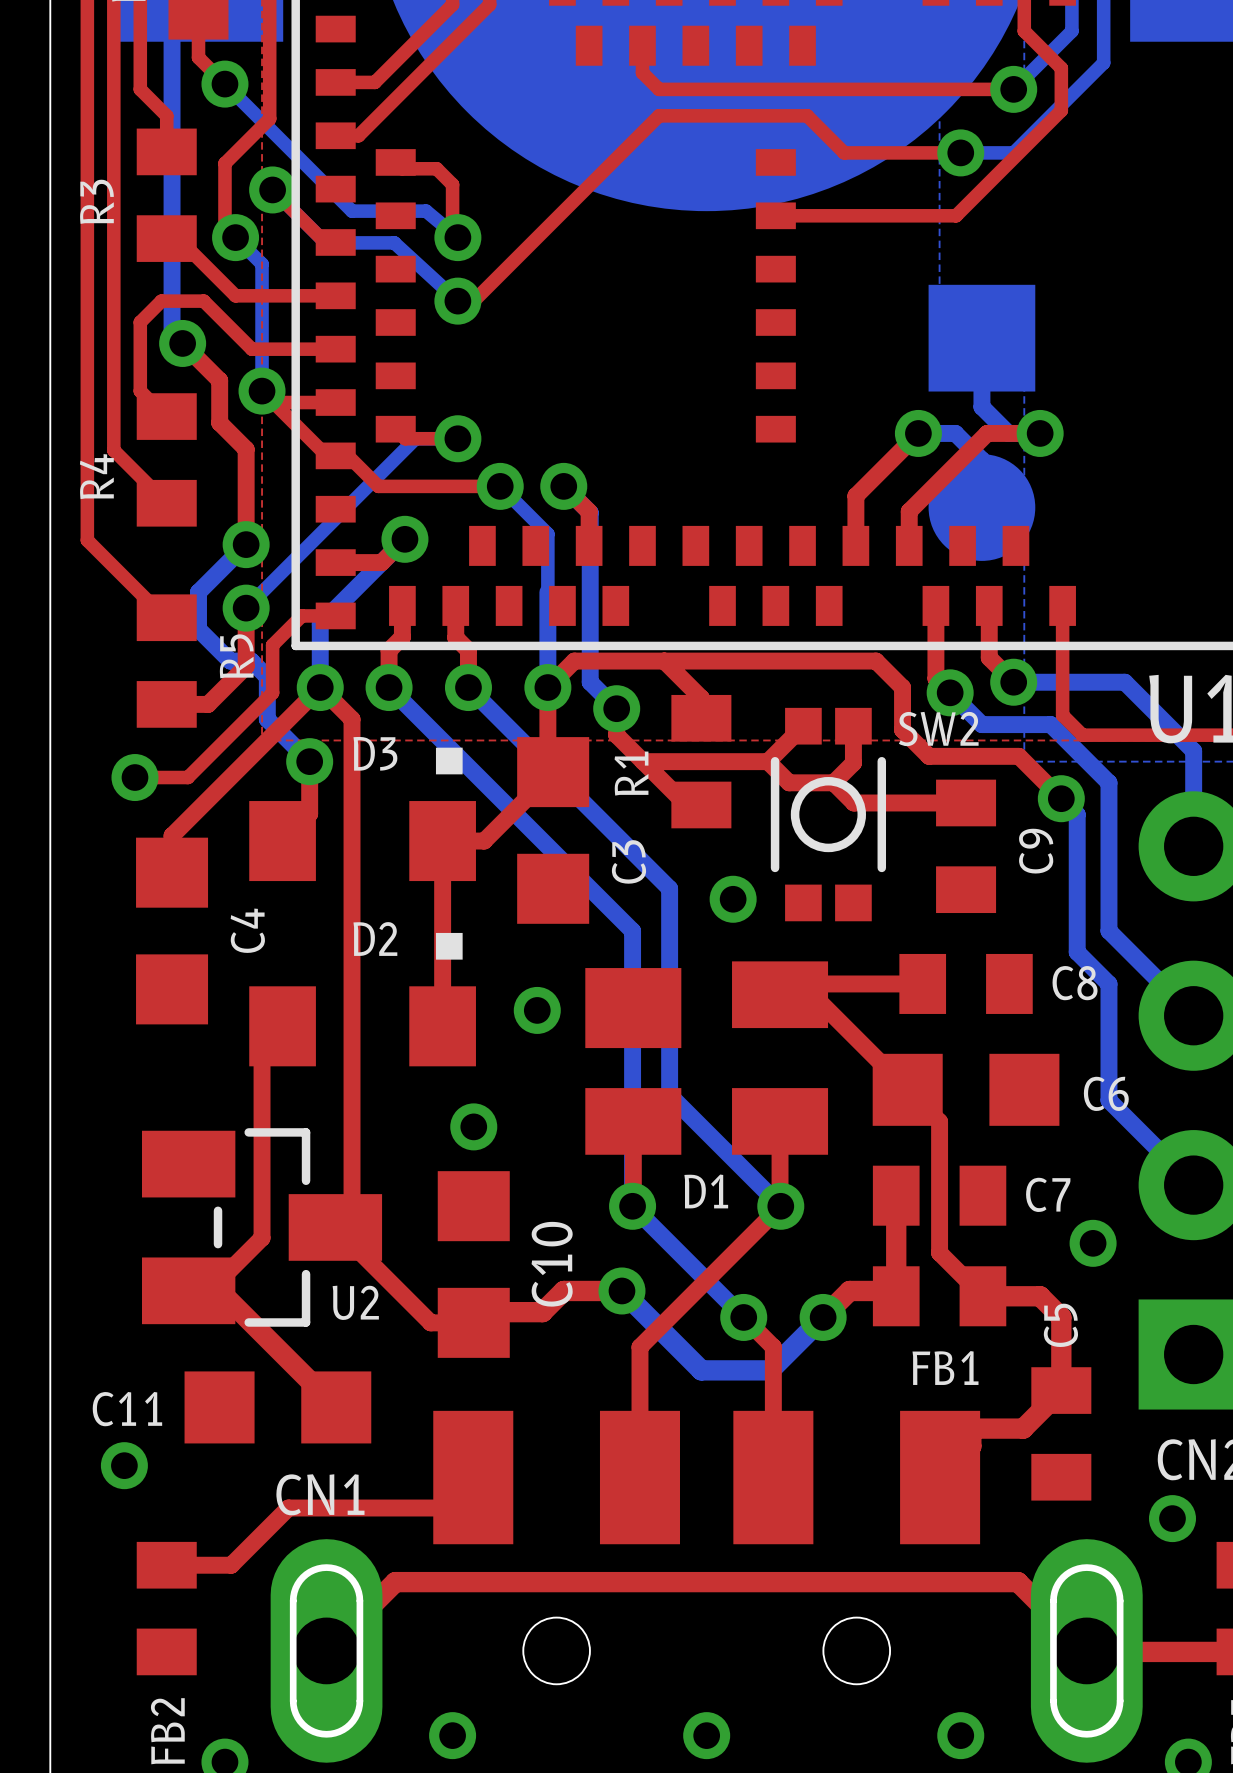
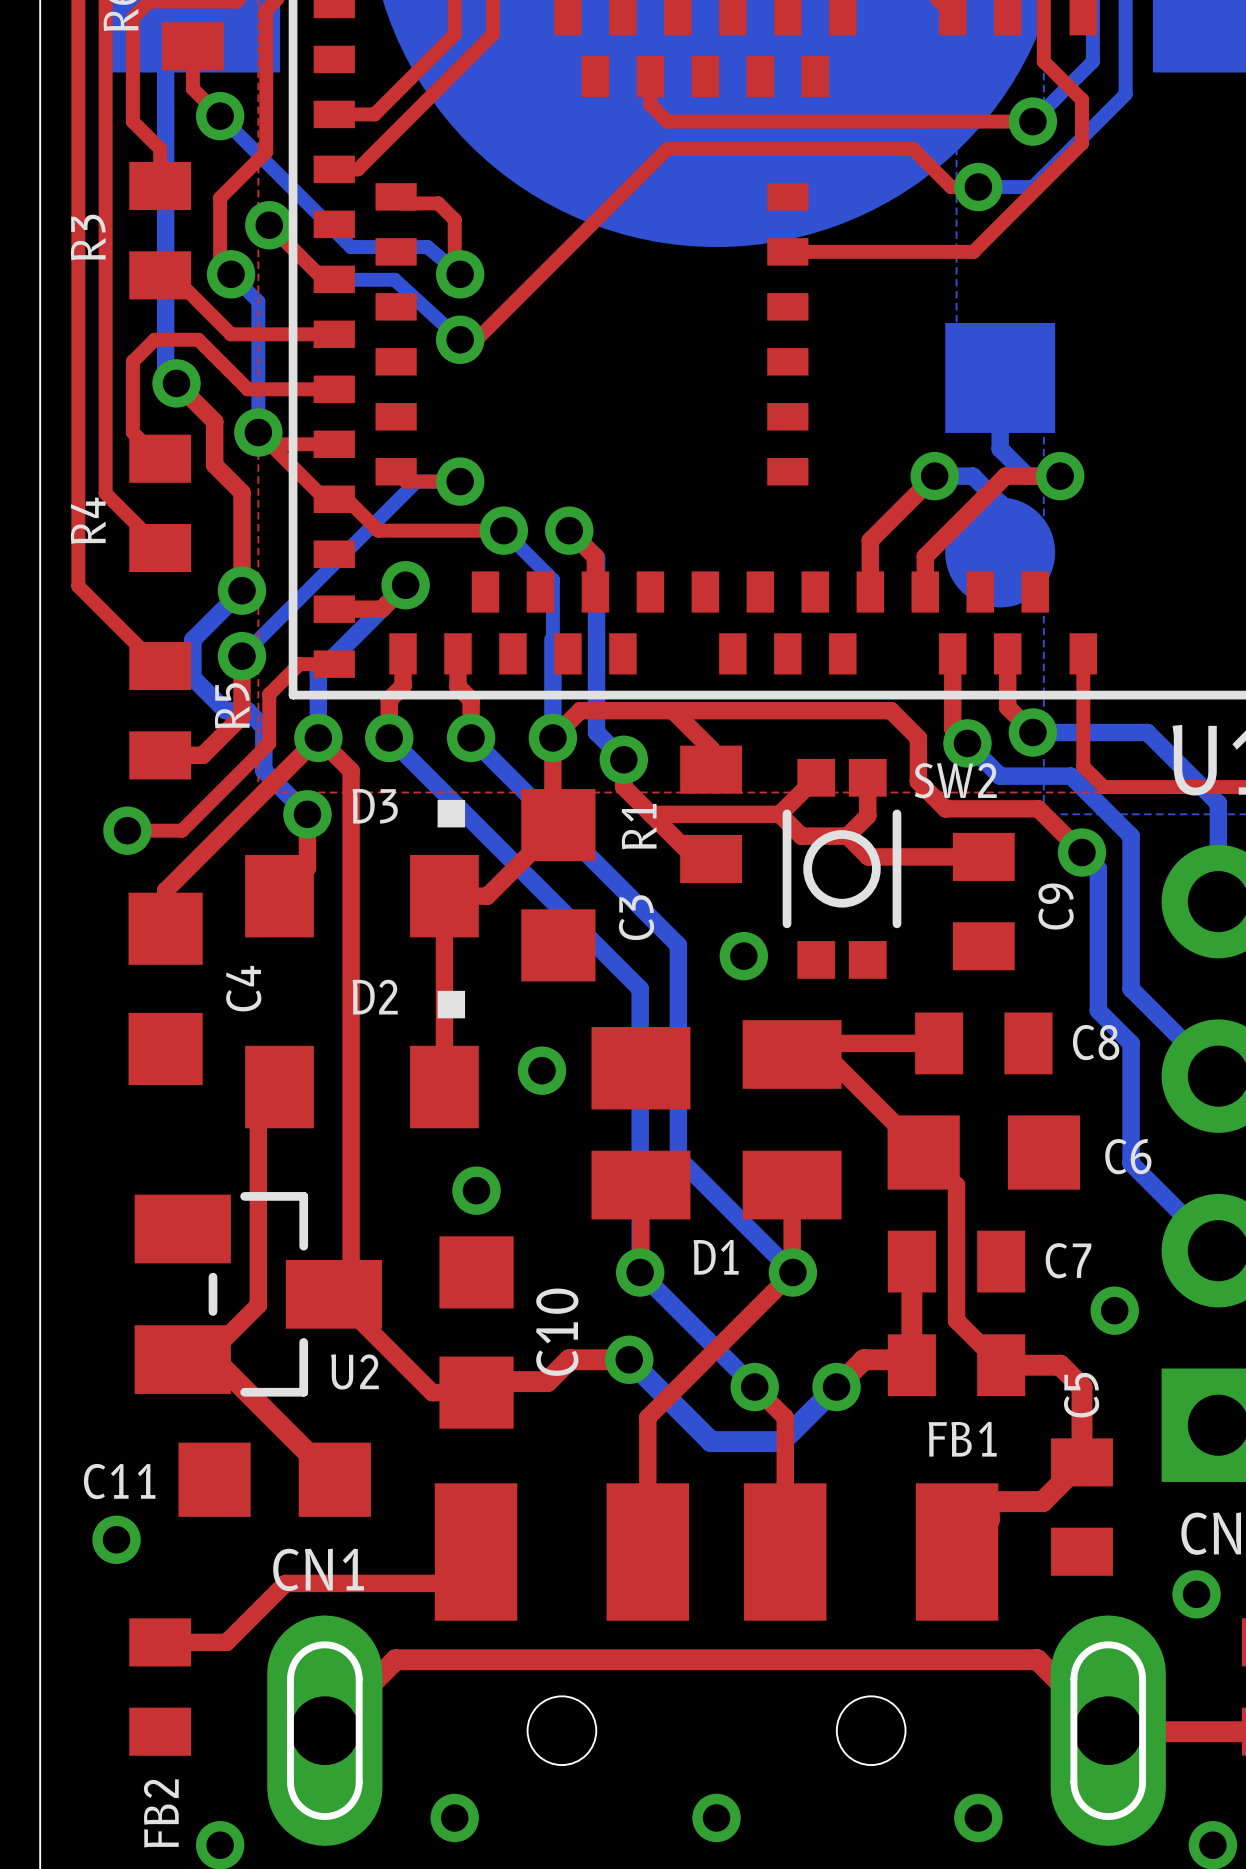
top track: (807, 115) (844, 152) (934, 152) -> (820, 148) (912, 148) (951, 187)

